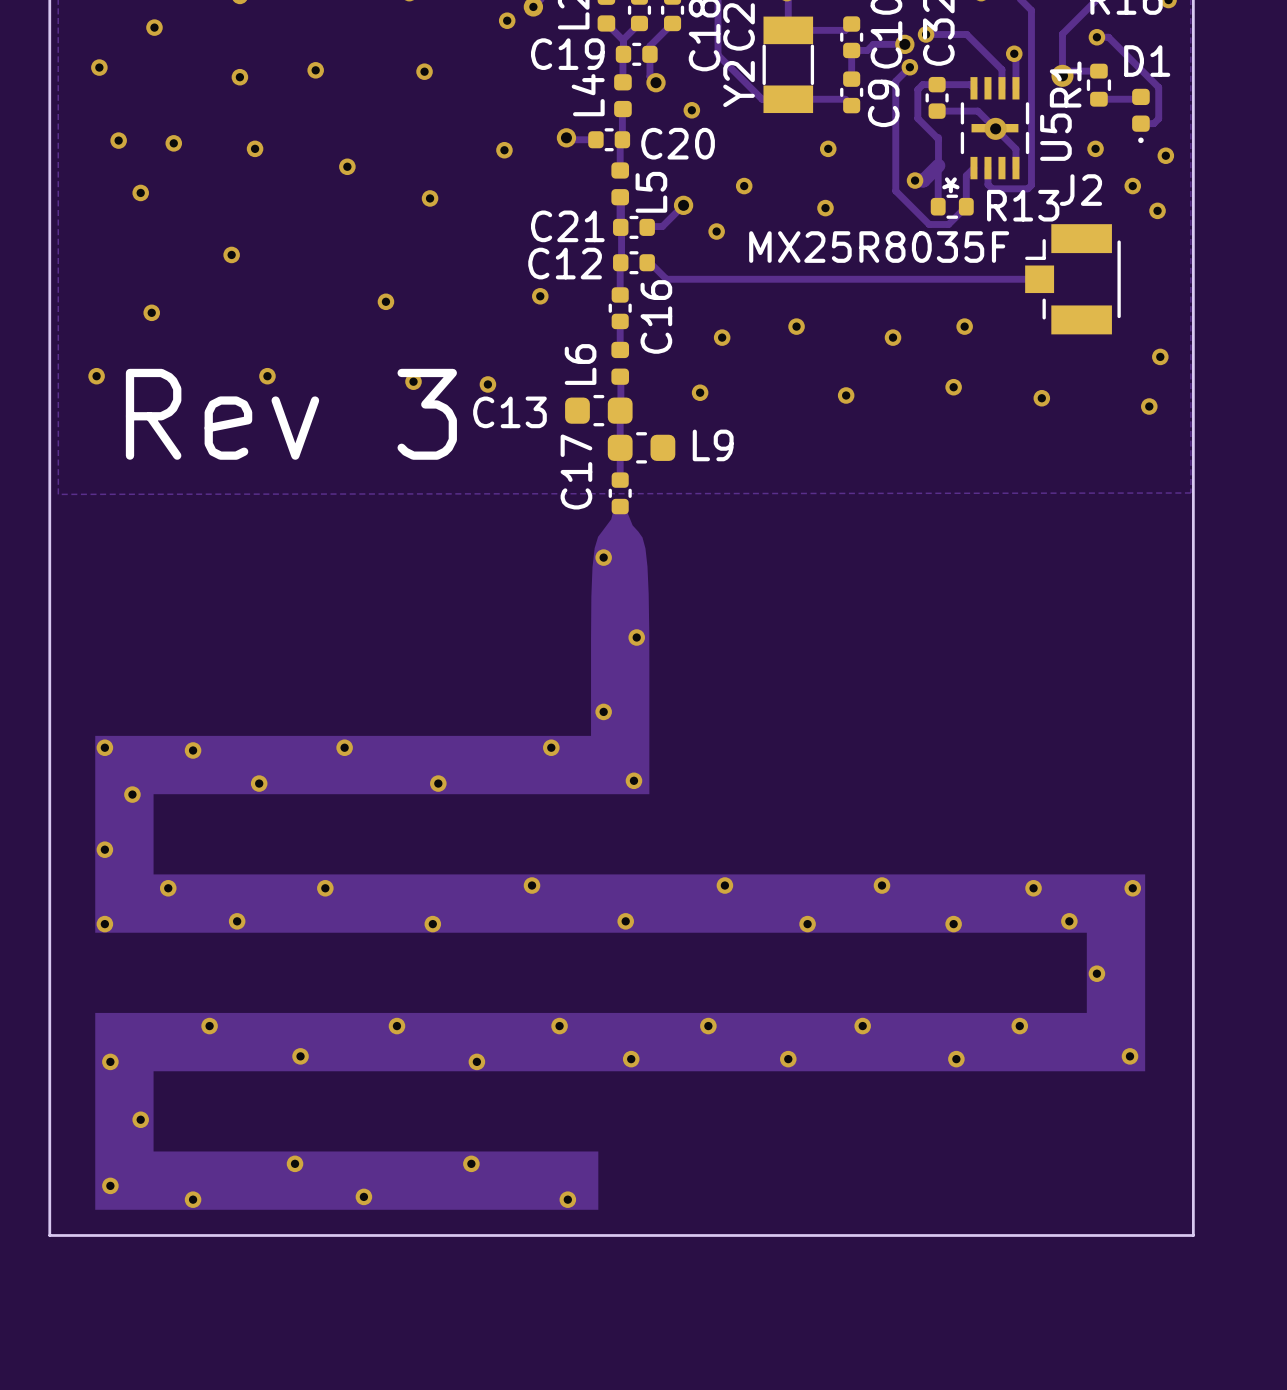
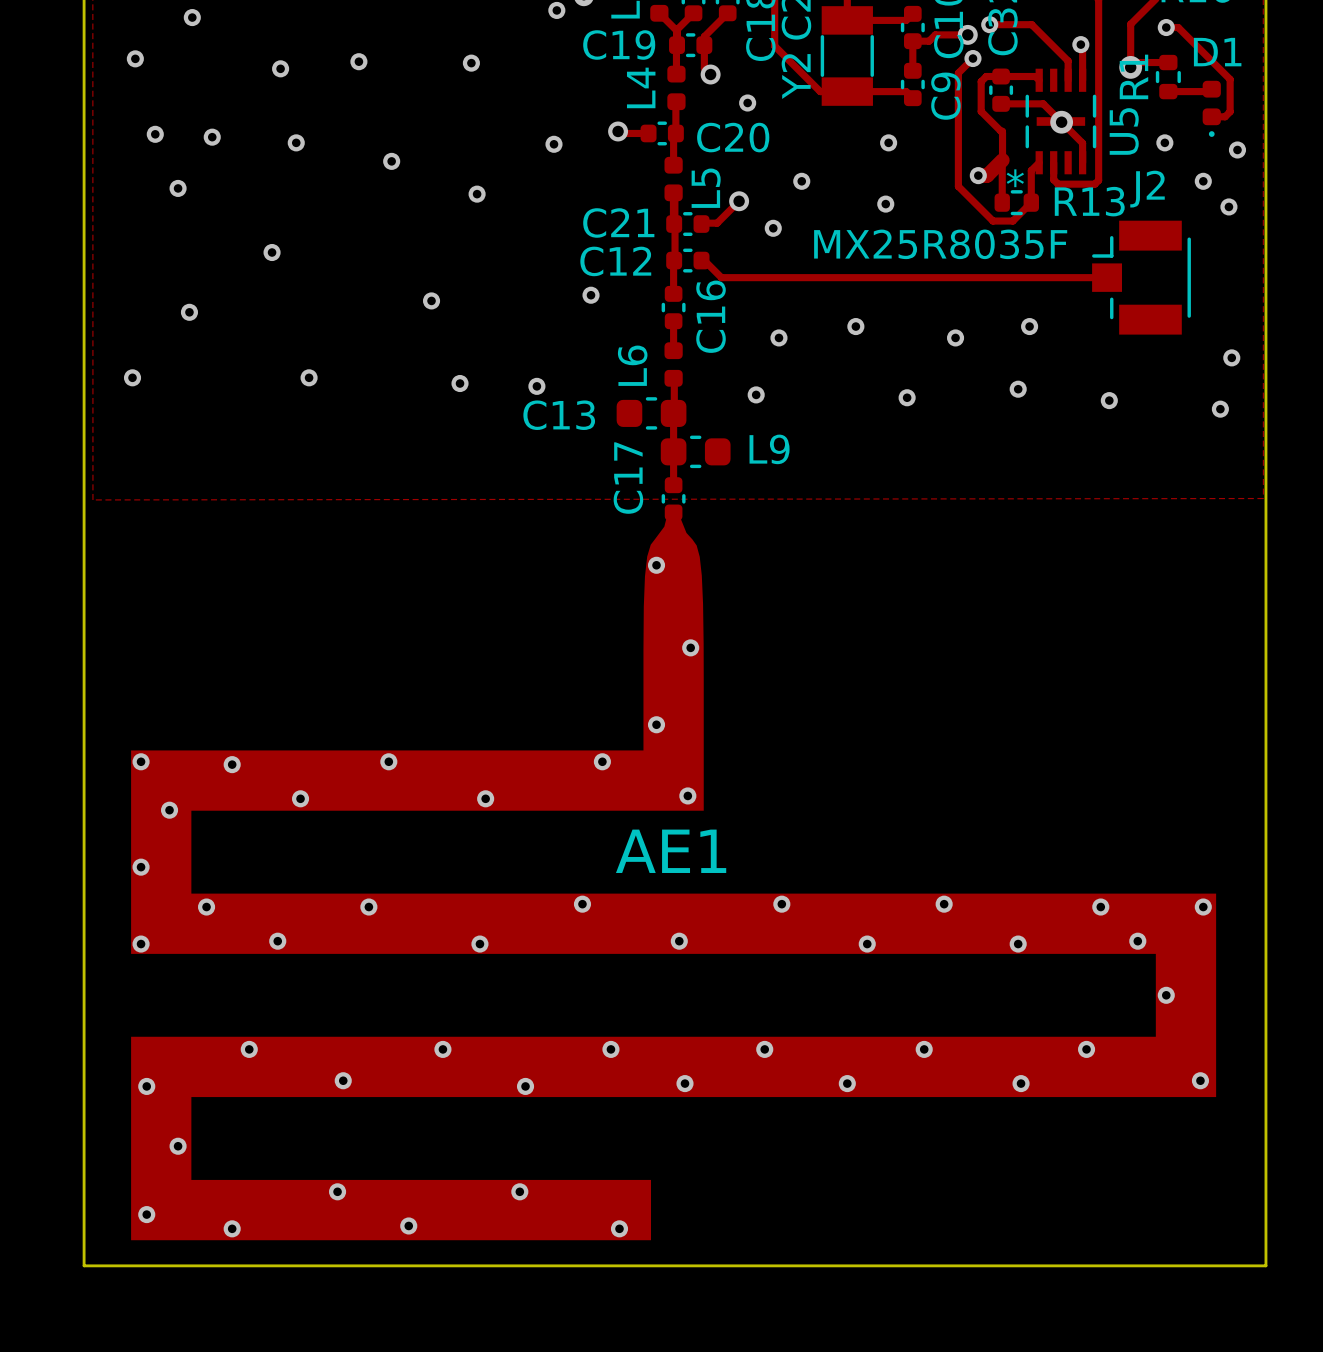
text: Rev 3 (291, 414) -> none
drawing: [95, 502, 1146, 1210] -> none
AE1: none -> (673, 874)

